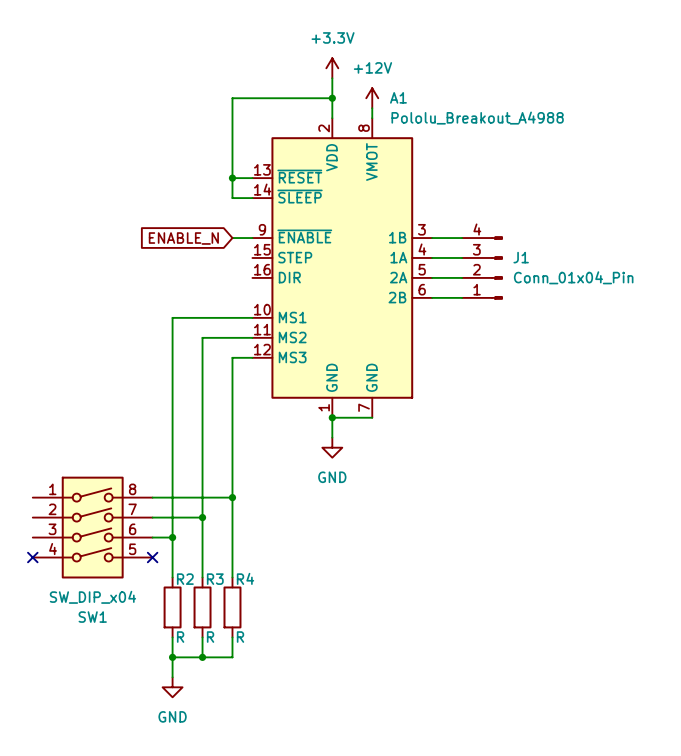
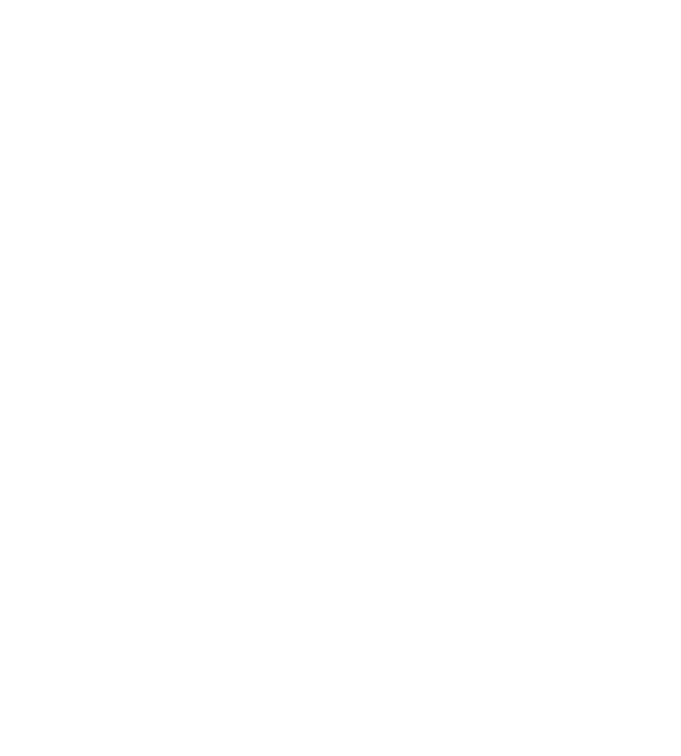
power symbol: +3.3V (332, 68) -> none
wire: (332, 78) (332, 118) -> none
wire: (332, 98) (232, 98) (232, 198) (252, 198) -> none
junction: (332, 98) -> none
power symbol: +12V (372, 98) -> none
wire: (372, 108) (372, 118) -> none
wire: (232, 178) (252, 178) -> none
junction: (232, 178) -> none
global label: ENABLE_N (183, 238) -> none
wire: (232, 238) (252, 238) -> none
wire: (432, 238) (462, 238) -> none
wire: (432, 257) (462, 257) -> none
A1: Pololu_Breakout_A4988 (342, 267) -> none
J1: Conn_01x04_Pin (482, 267) -> none
wire: (432, 277) (462, 277) -> none
wire: (432, 297) (462, 297) -> none
wire: (252, 317) (172, 317) (172, 577) -> none
wire: (252, 337) (202, 337) (202, 577) -> none
wire: (252, 357) (232, 357) (232, 577) -> none
junction: (332, 417) -> none
wire: (372, 417) (332, 417) (332, 437) -> none
power symbol: GND (332, 447) -> none
wire: (152, 497) (232, 497) -> none
junction: (232, 497) -> none
wire: (152, 517) (202, 517) -> none
junction: (202, 517) -> none
SW1: SW_DIP_x04 (92, 527) -> none
wire: (152, 537) (172, 537) -> none
junction: (172, 537) -> none
no-connect mark: (32, 557) -> none
no-connect mark: (152, 557) -> none
R2: R (172, 607) -> none
R3: R (202, 607) -> none
R4: R (232, 607) -> none
wire: (172, 637) (172, 677) -> none
wire: (202, 637) (202, 657) -> none
wire: (232, 637) (232, 657) (172, 657) -> none
junction: (172, 657) -> none
junction: (202, 657) -> none
power symbol: GND (172, 687) -> none

